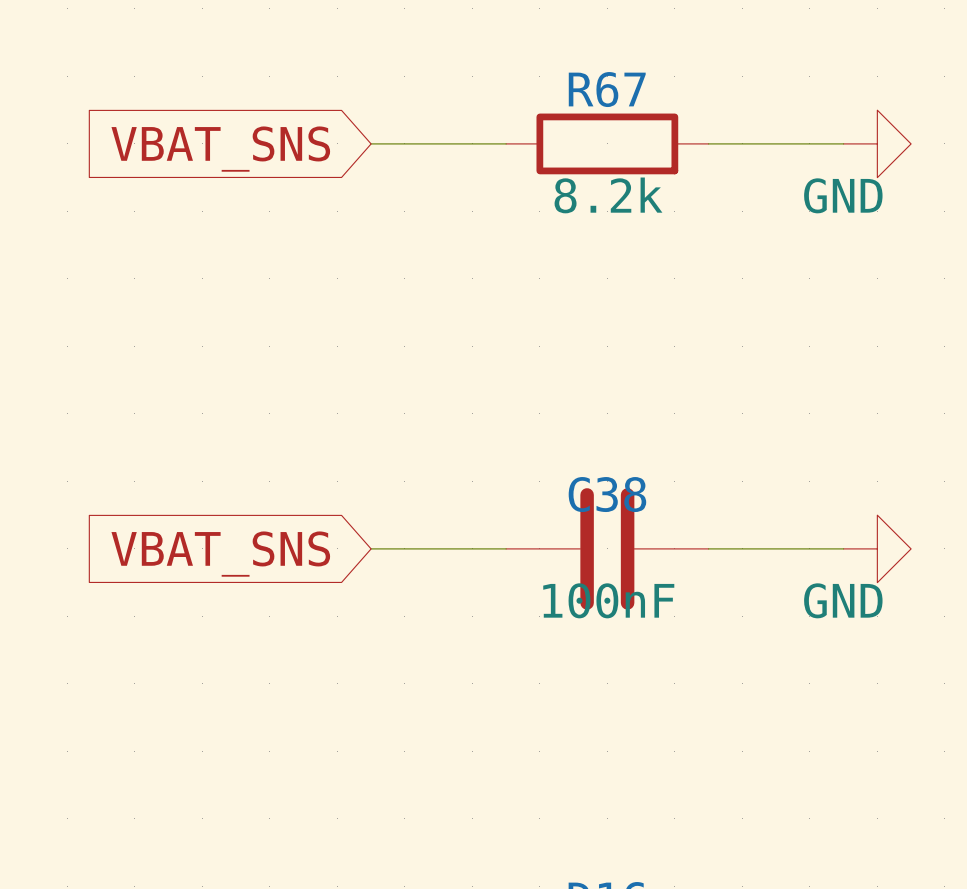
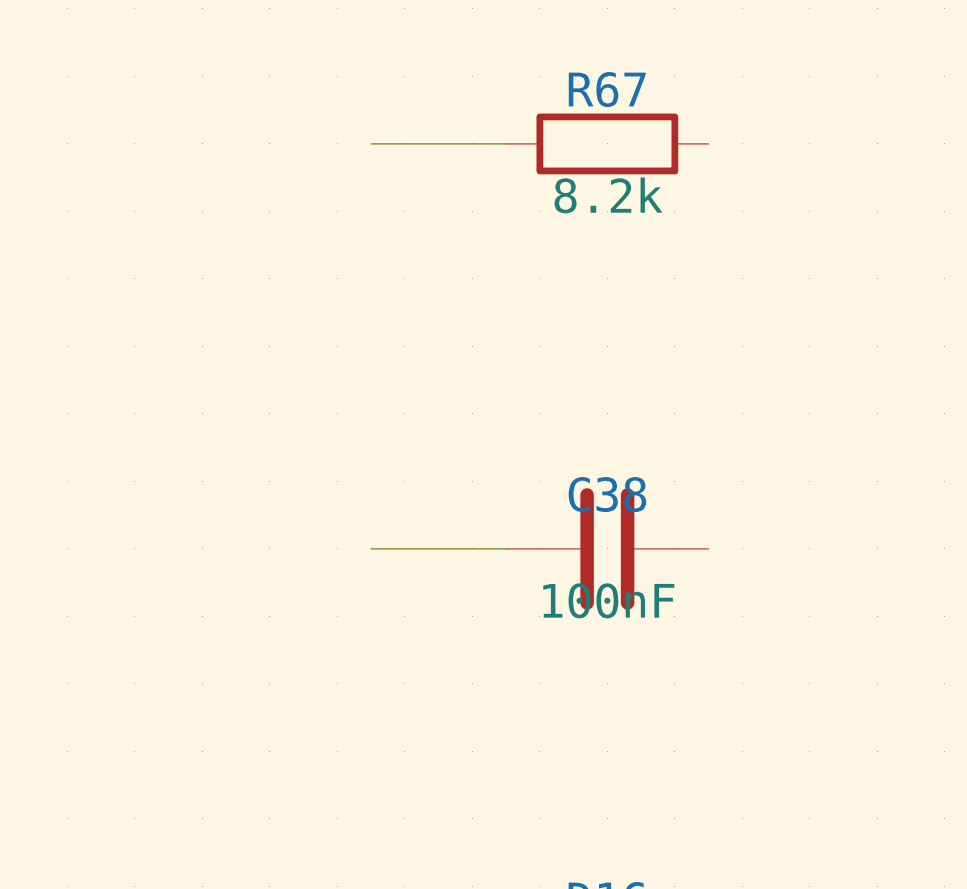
wire: (708, 143) (843, 143) -> none
power symbol: GND (877, 143) -> none
global label: VBAT_SNS (220, 149) -> none
wire: (708, 548) (843, 548) -> none
power symbol: GND (877, 548) -> none
global label: VBAT_SNS (220, 554) -> none

